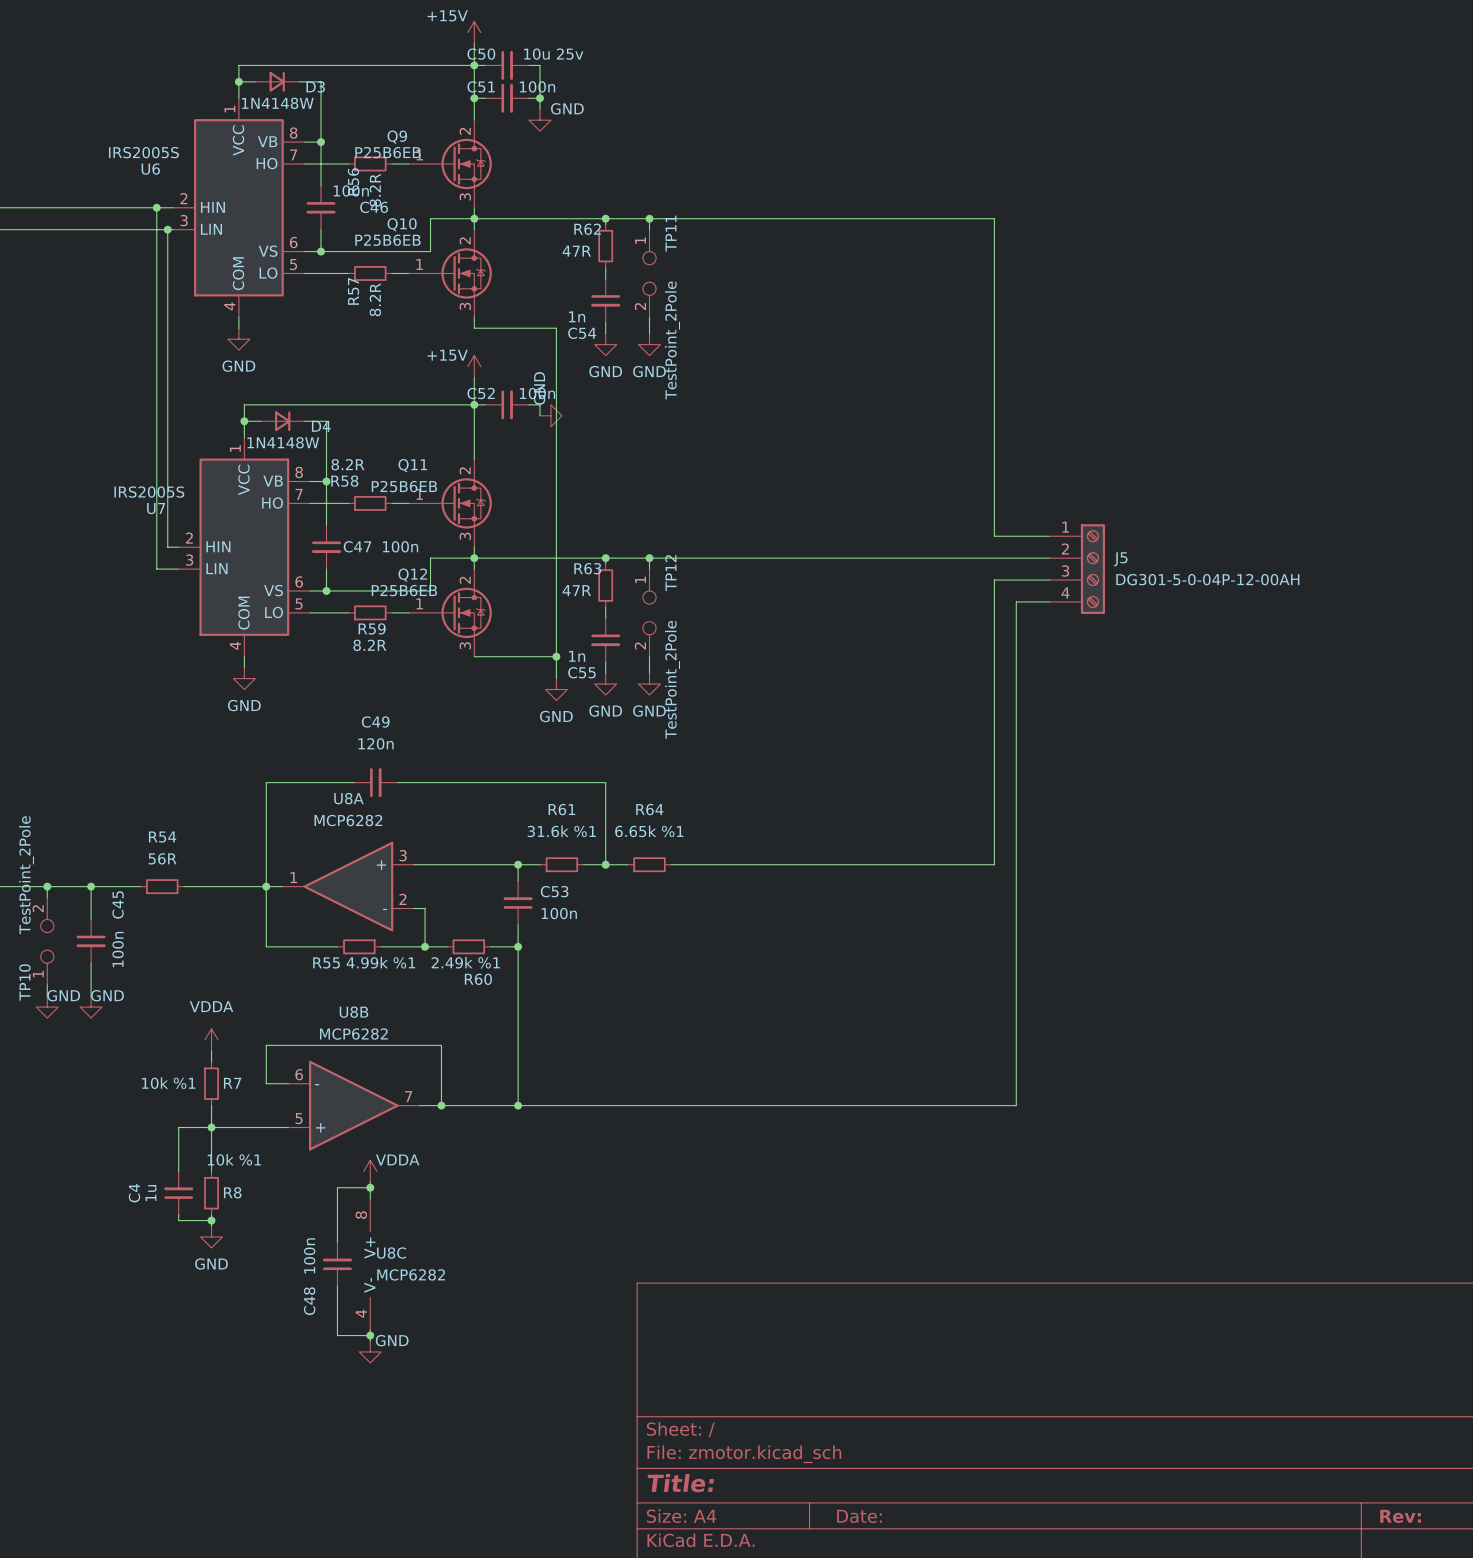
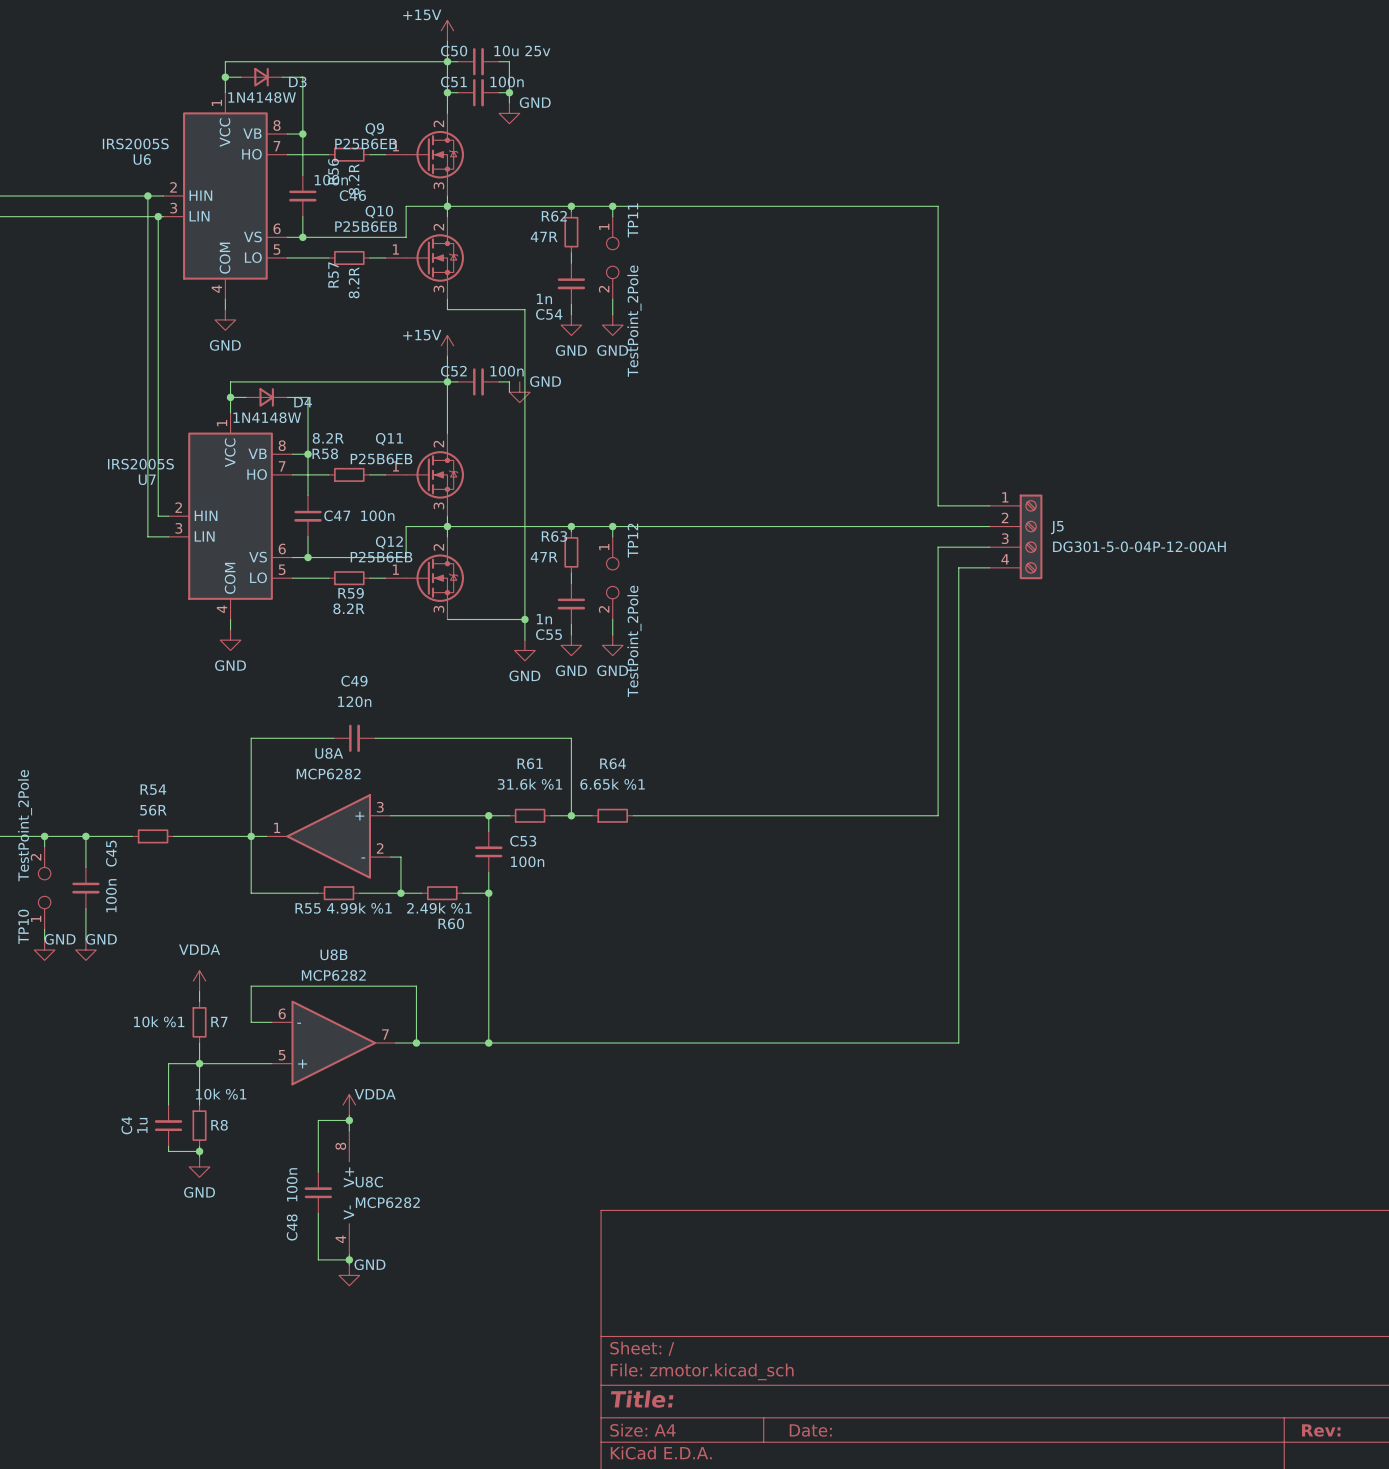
power symbol rotation: 0° (550, 415) -> 90° clockwise (519, 392)

